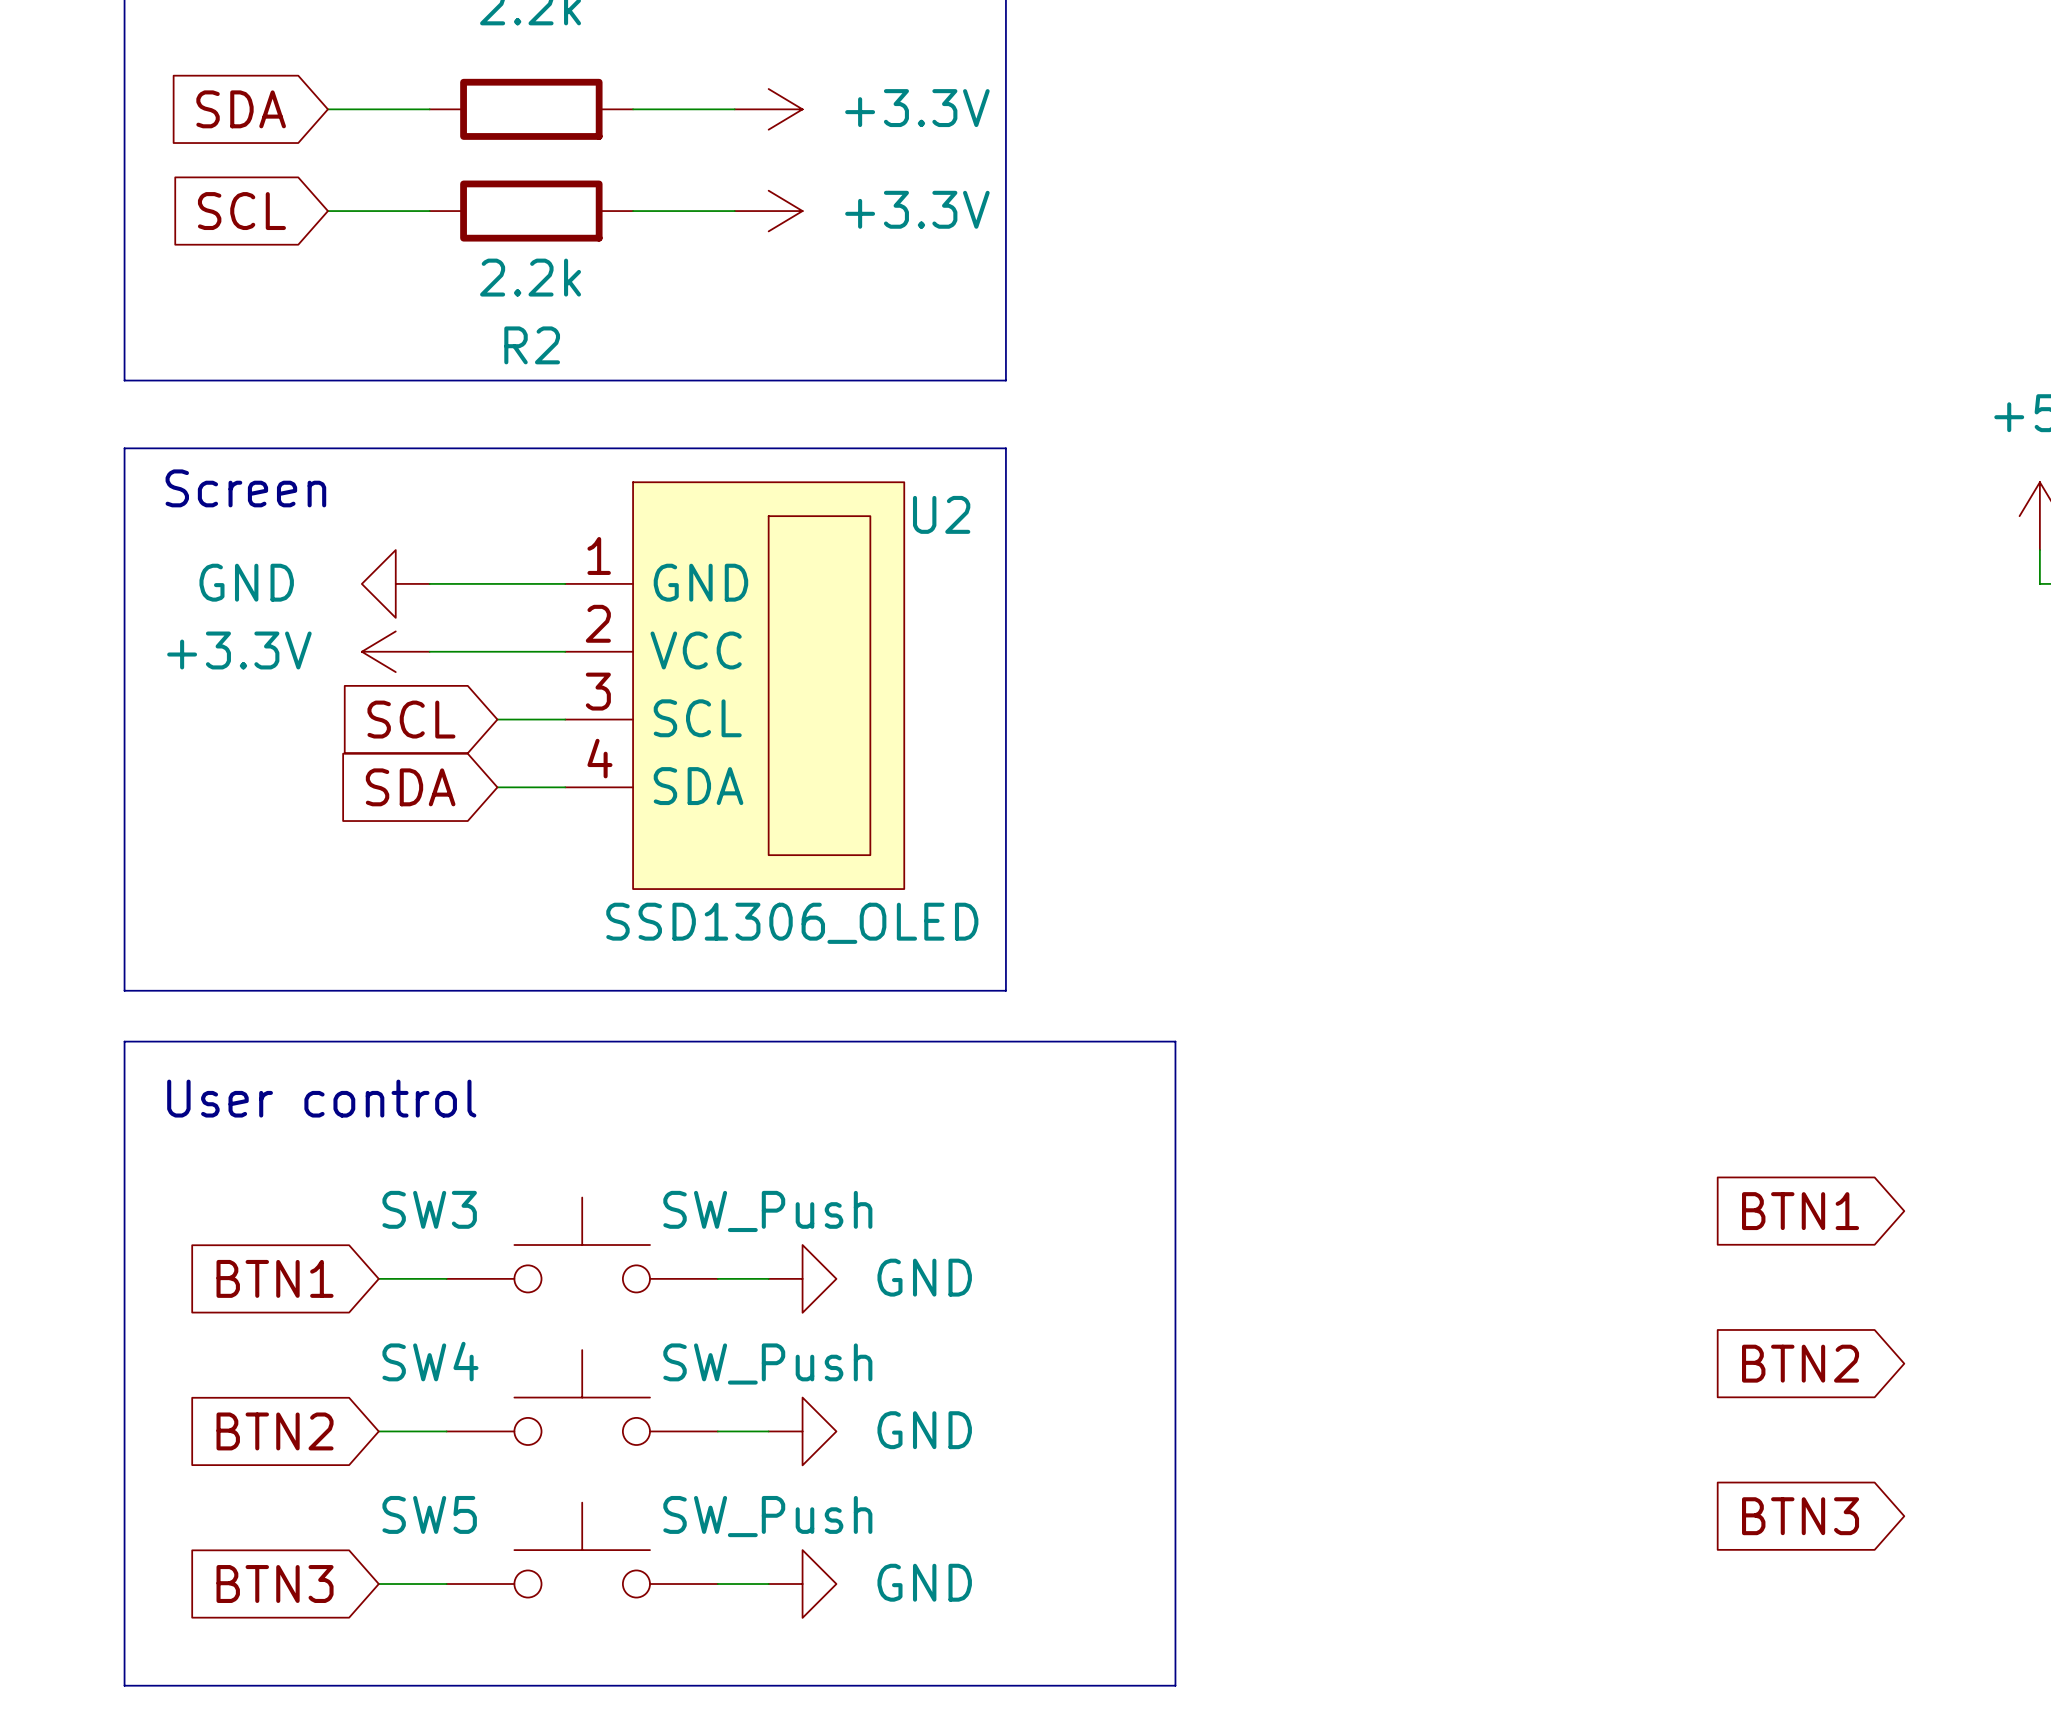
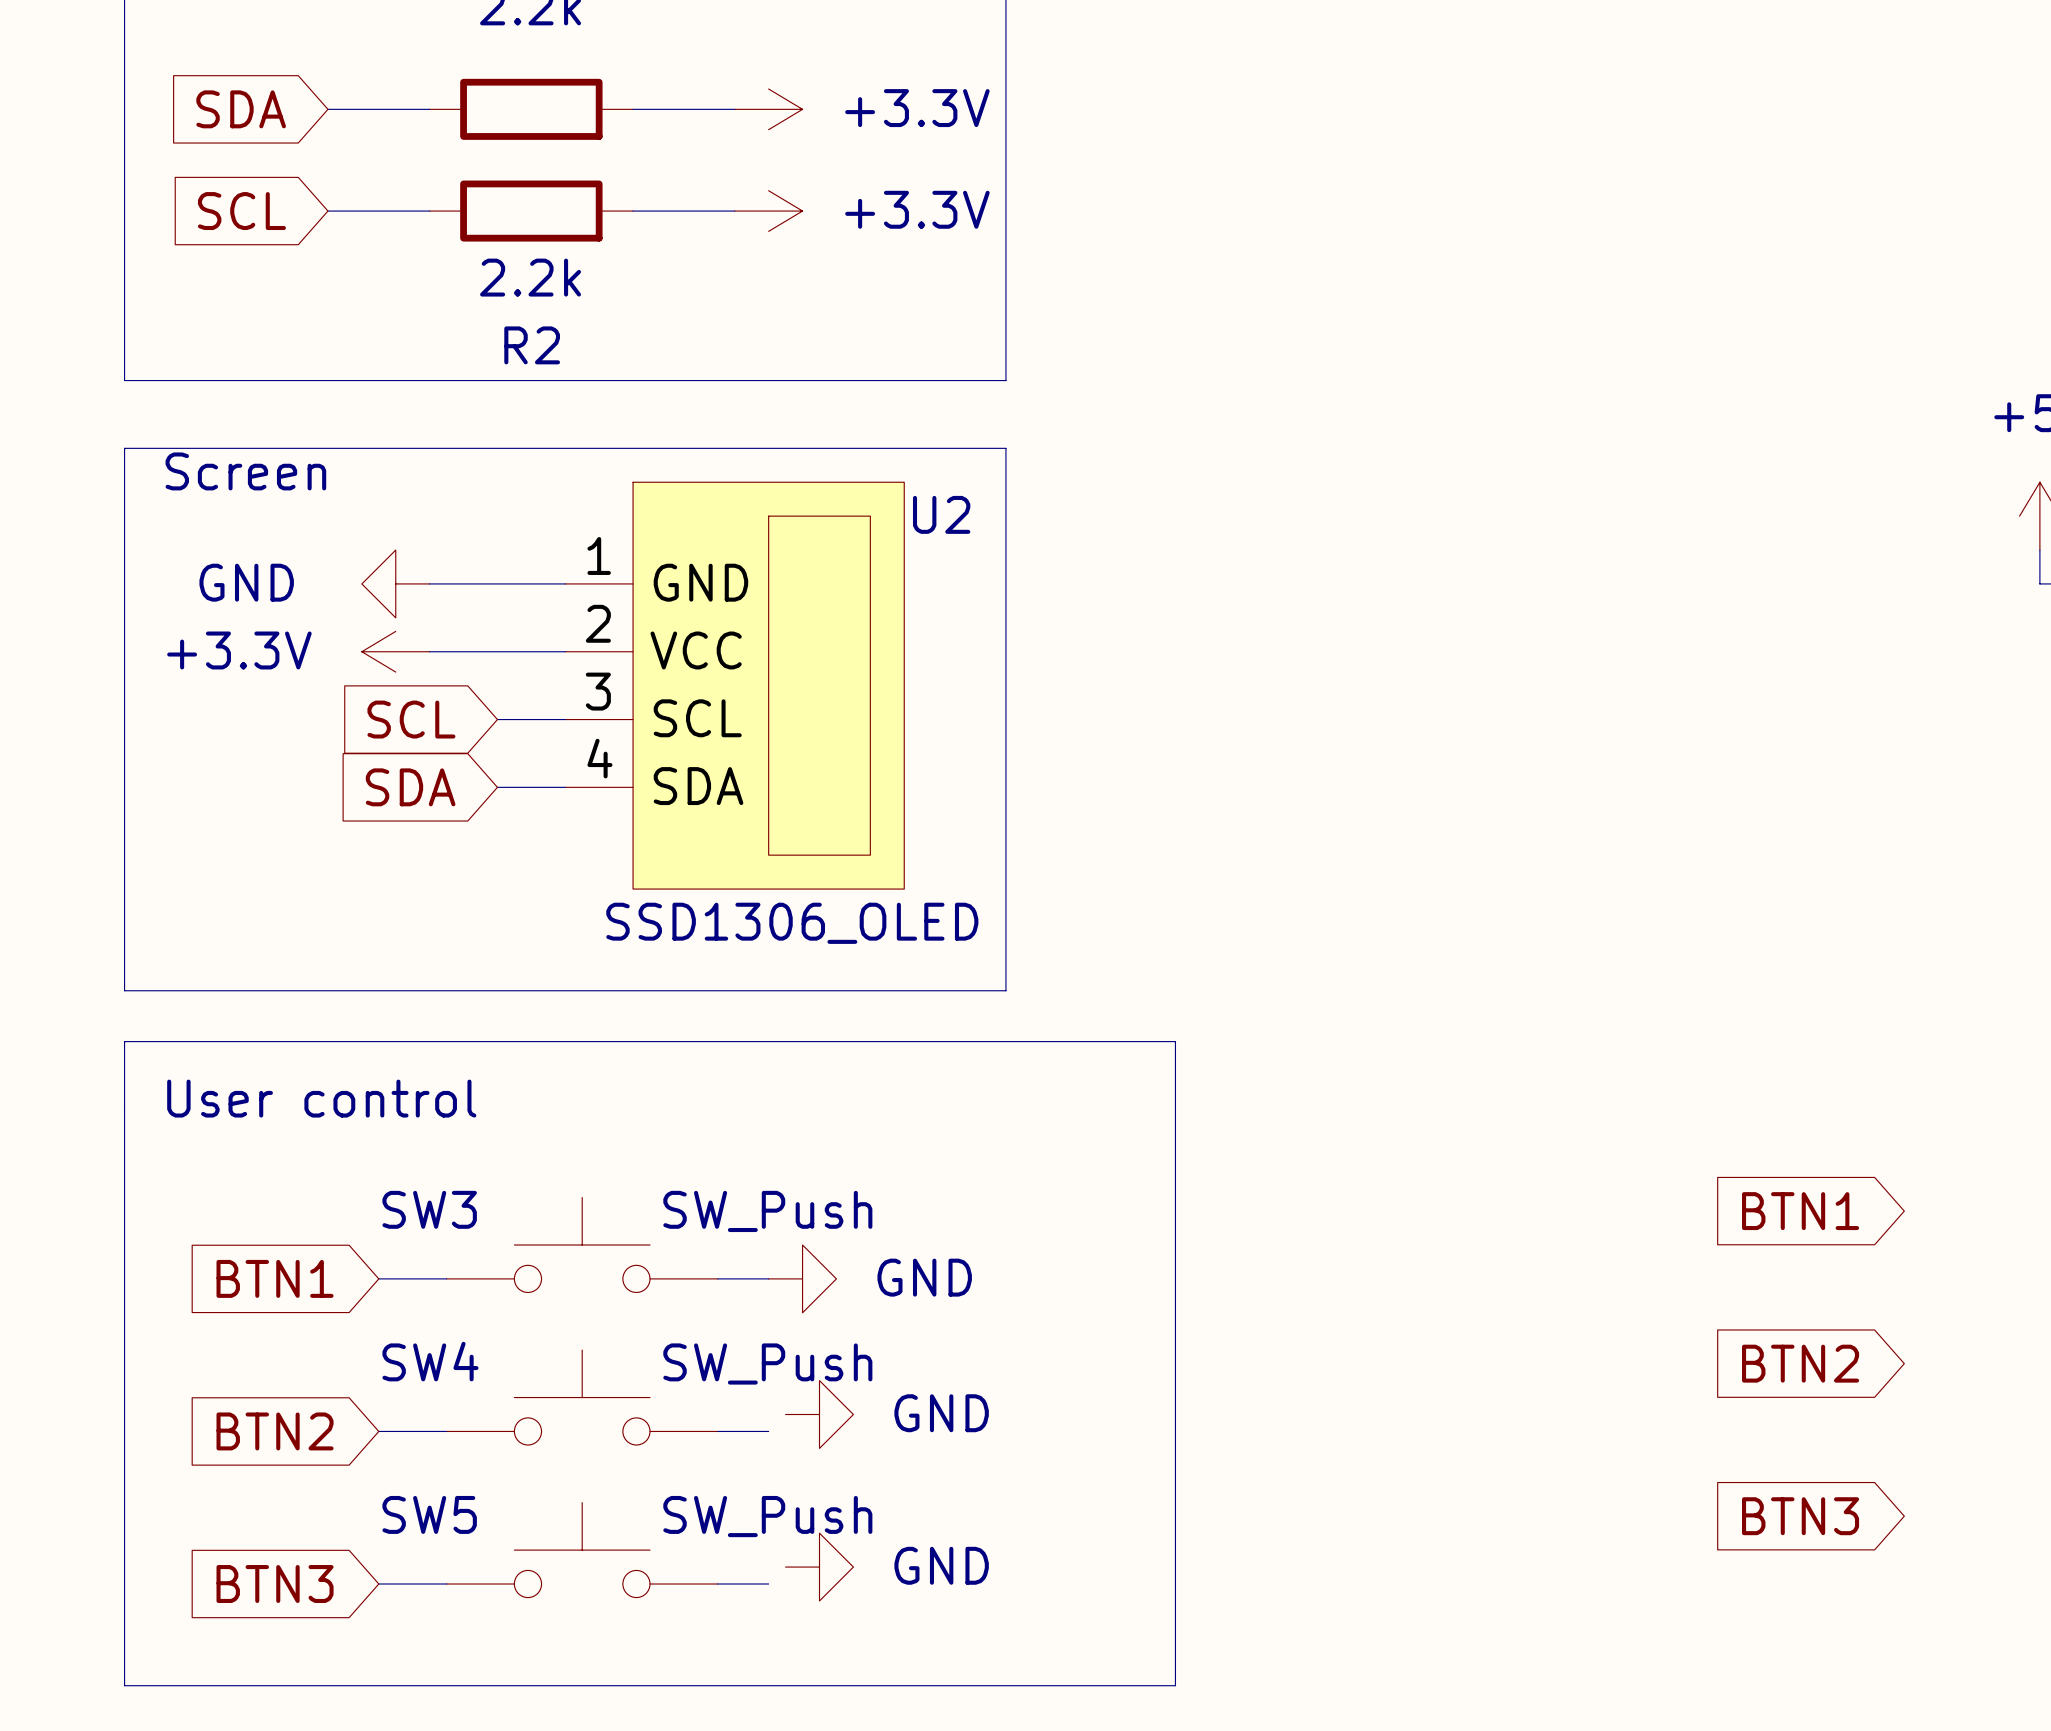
text position: Screen (245, 488) -> Screen (245, 471)
power symbol position: GND (802, 1431) -> GND (819, 1414)
power symbol position: GND (802, 1584) -> GND (819, 1567)

